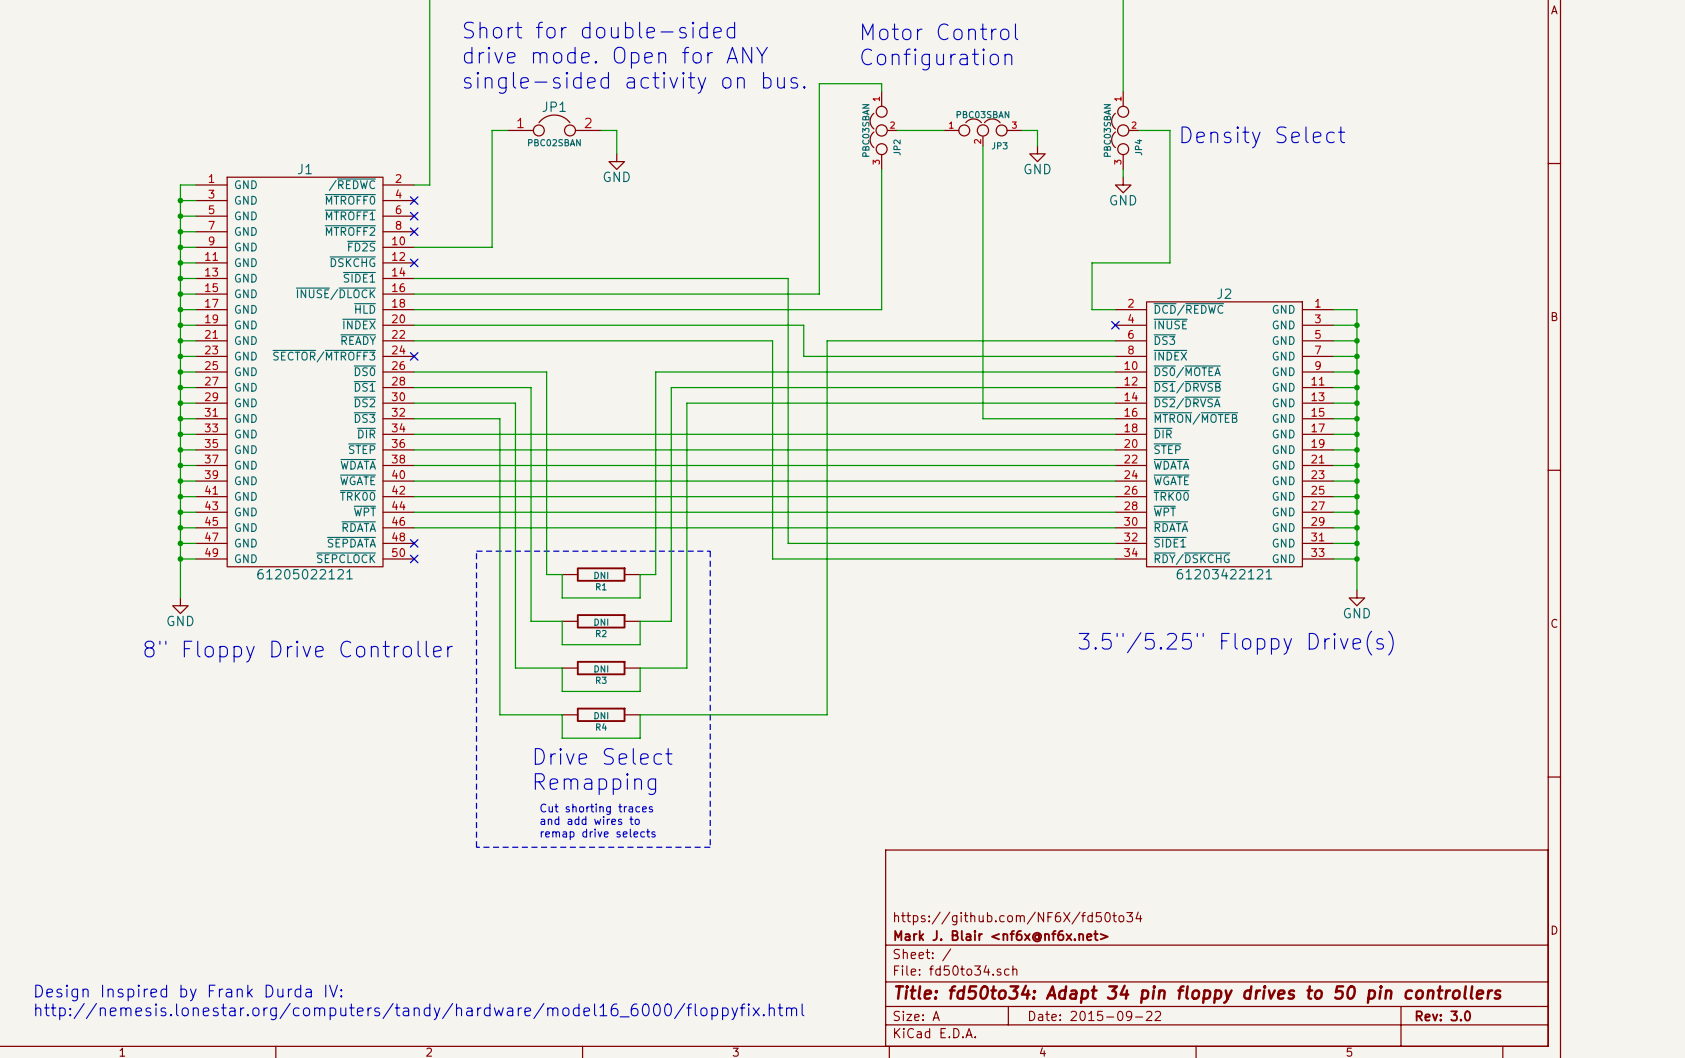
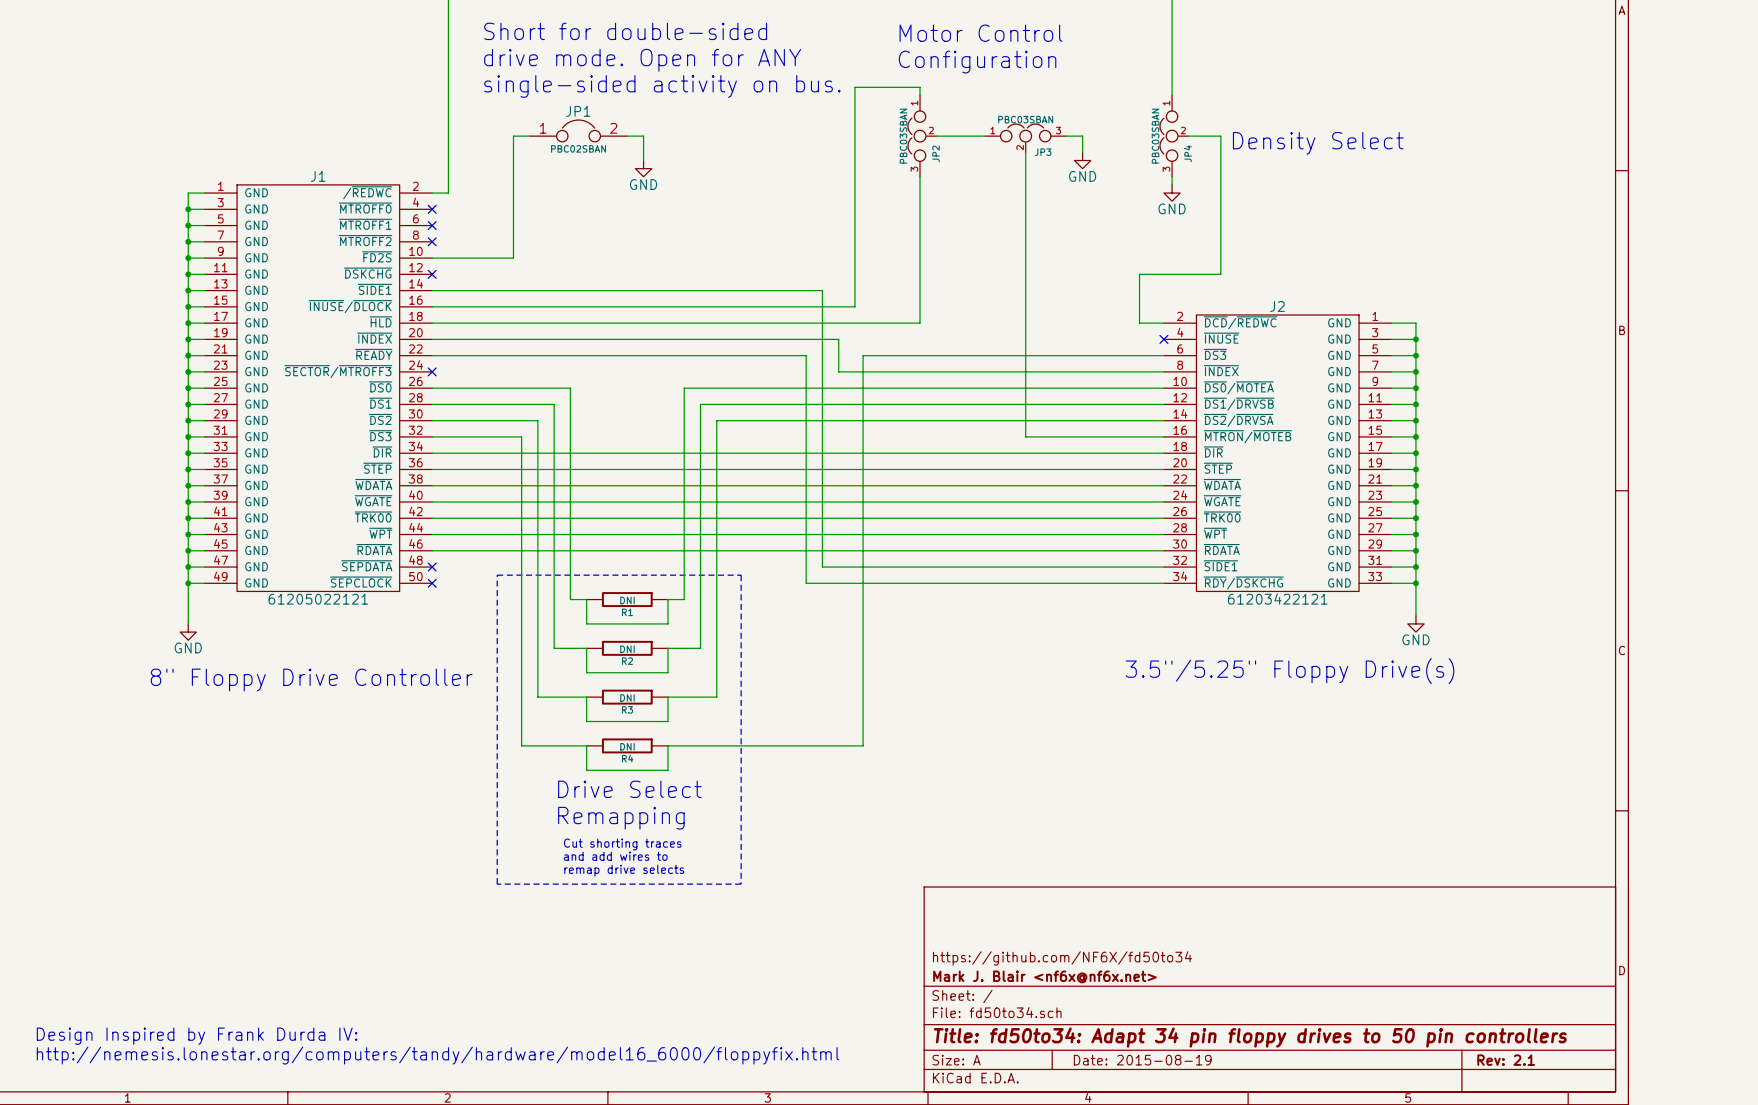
title block: Date: 2015-09-22 (1095, 1015) -> Date: 2015-08-19 (1142, 1060)
title block: Rev: 3.0 (1443, 1015) -> Rev: 2.1 (1506, 1060)

